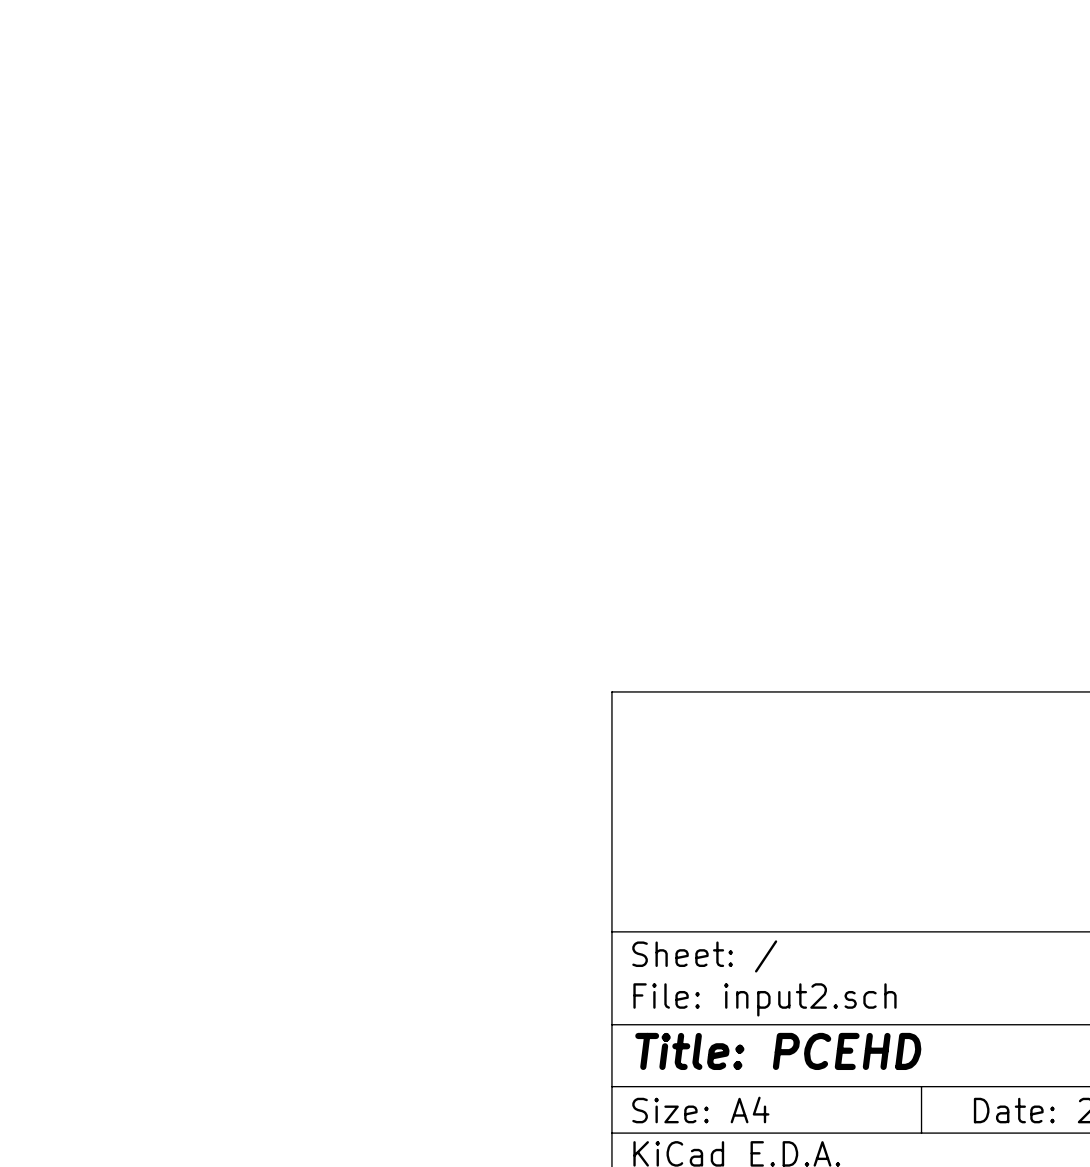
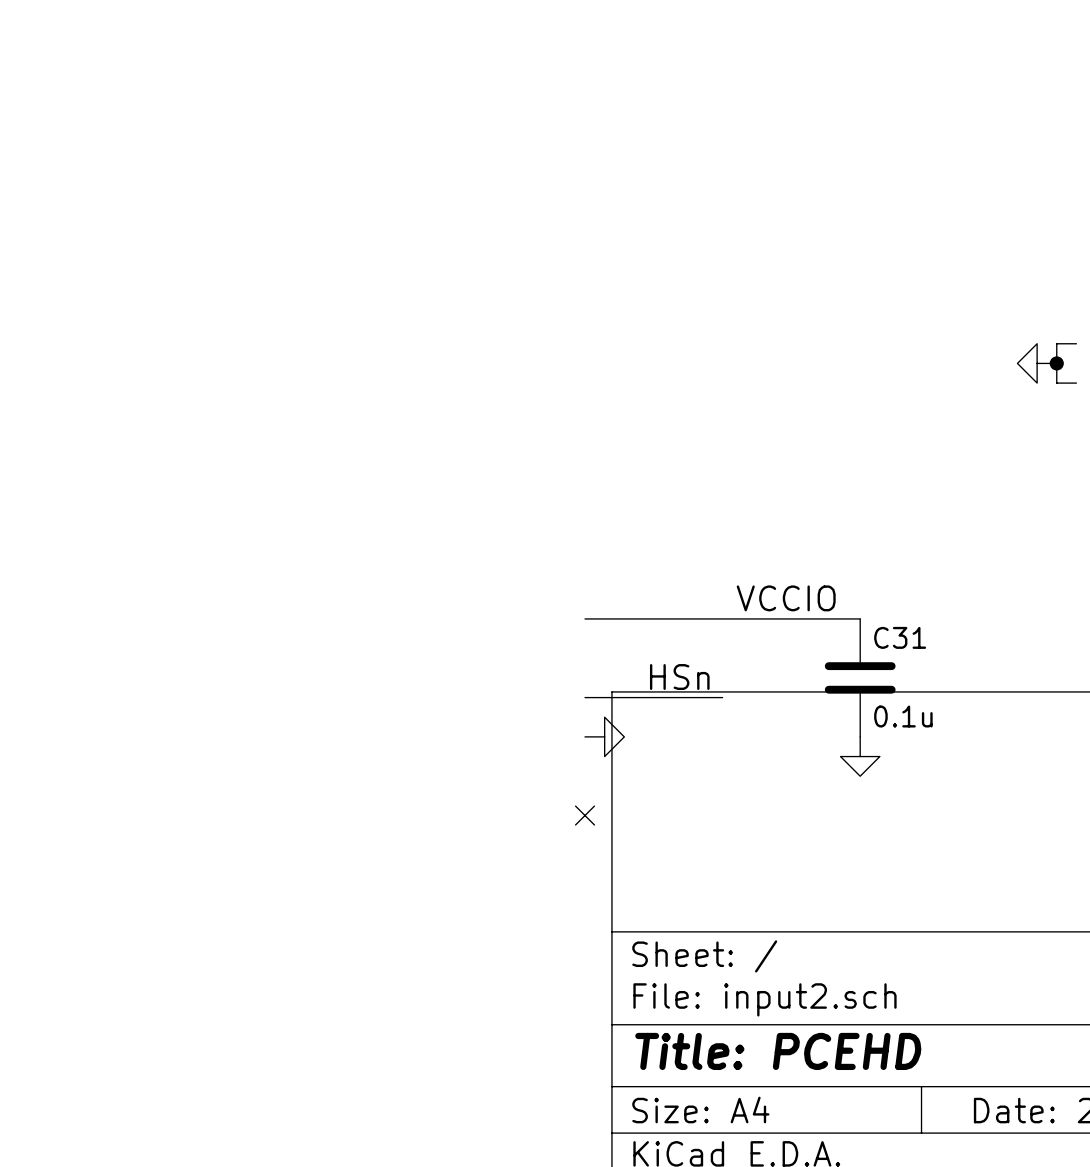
wire: none -> (1076, 343) (1056, 343) (1056, 383) (1076, 383)
power symbol: none -> (1037, 363)
junction: none -> (1056, 363)
label: none -> VCCIO (786, 598)
wire: none -> (585, 618) (860, 618)
label: none -> HSn (679, 677)
C31: none -> 0.1u (860, 677)
wire: none -> (585, 697) (722, 697)
power symbol: none -> (604, 736)
power symbol: none -> (860, 756)
no-connect mark: none -> (585, 815)

